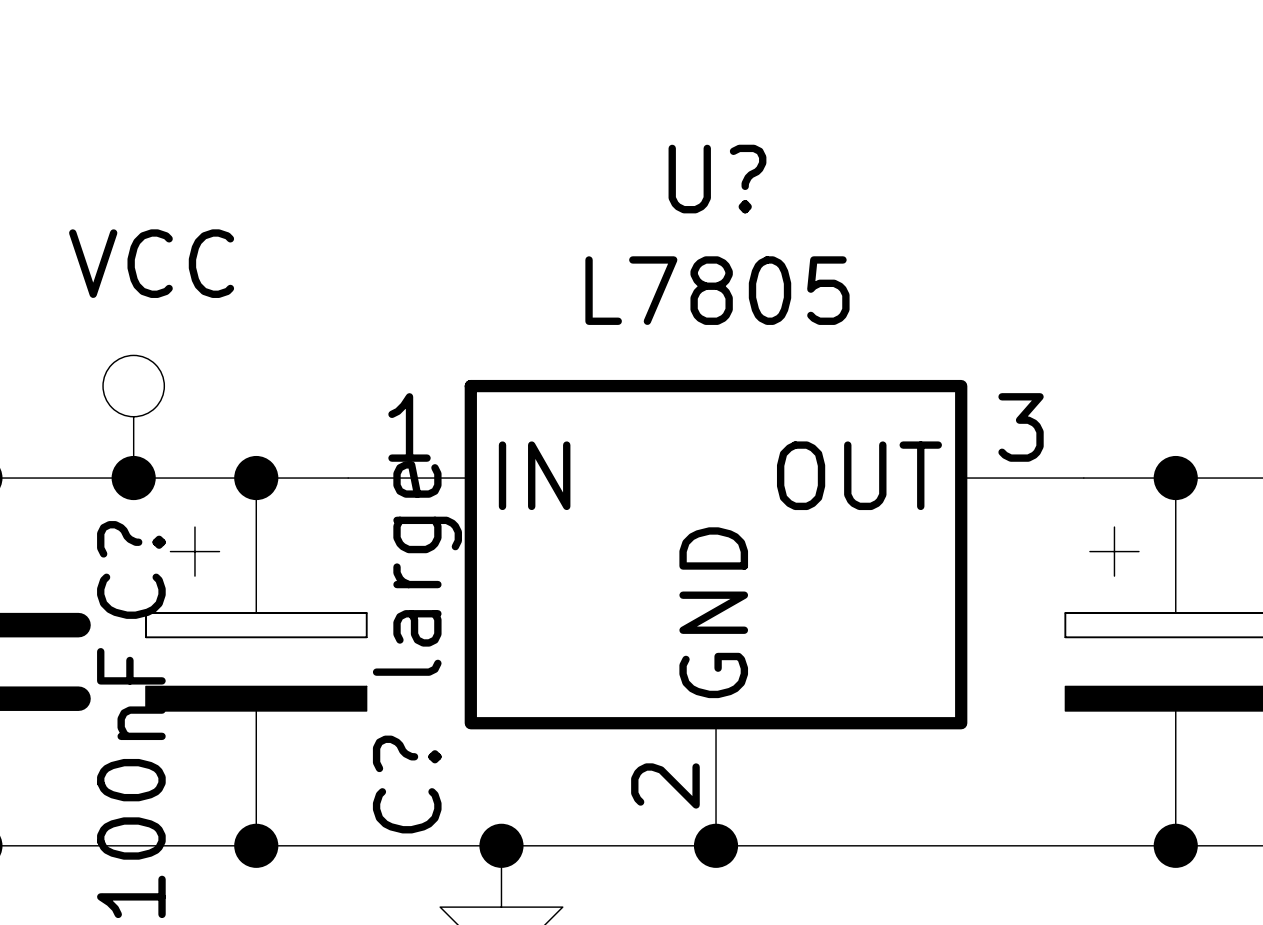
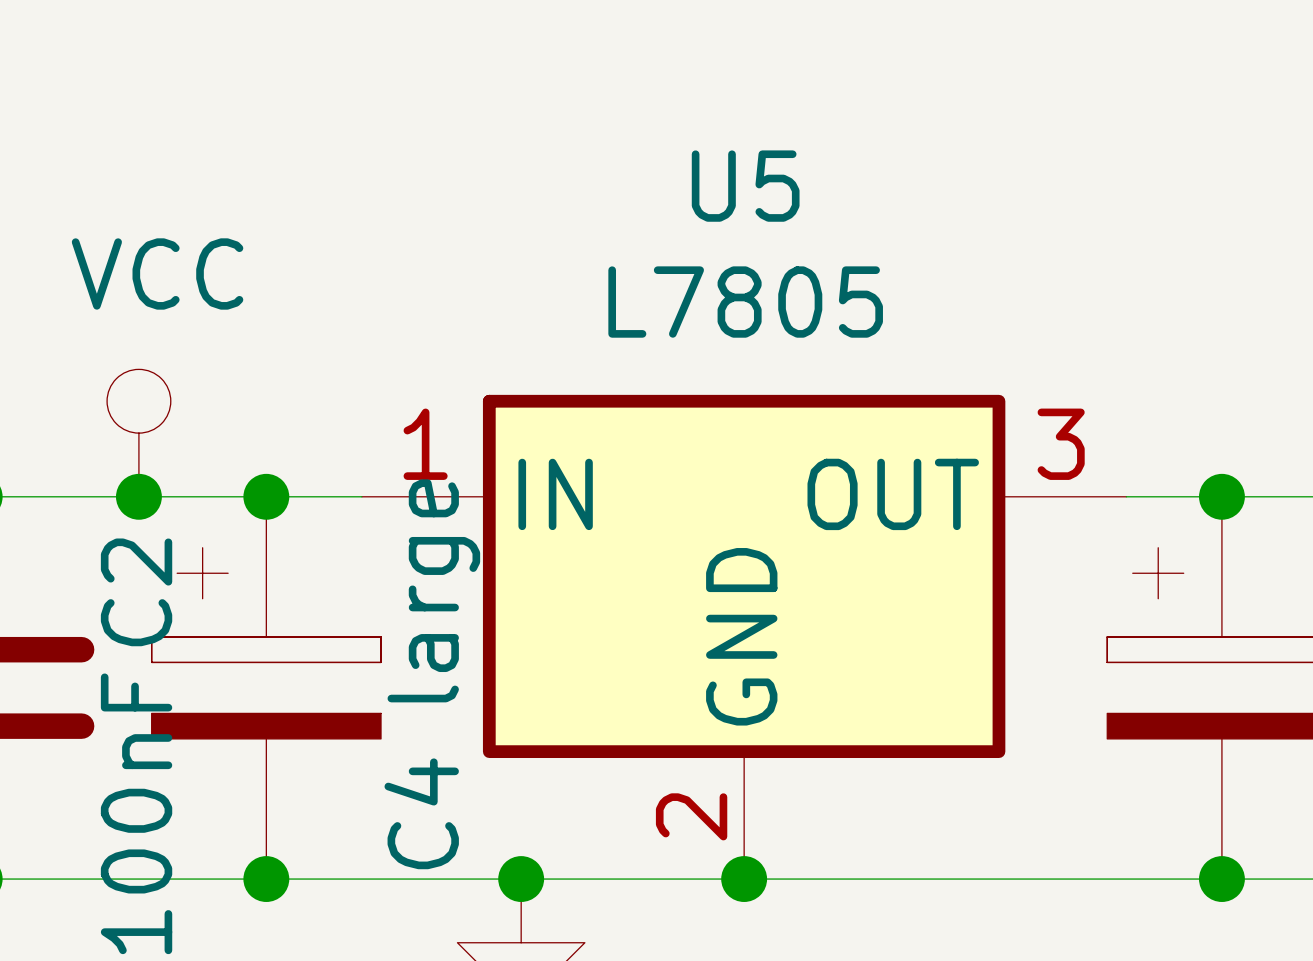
U? name: U? (717, 179) -> U5 (745, 186)
C? name: C? (131, 569) -> C2 (136, 592)
C? name: C? (407, 784) -> C4 (421, 813)

